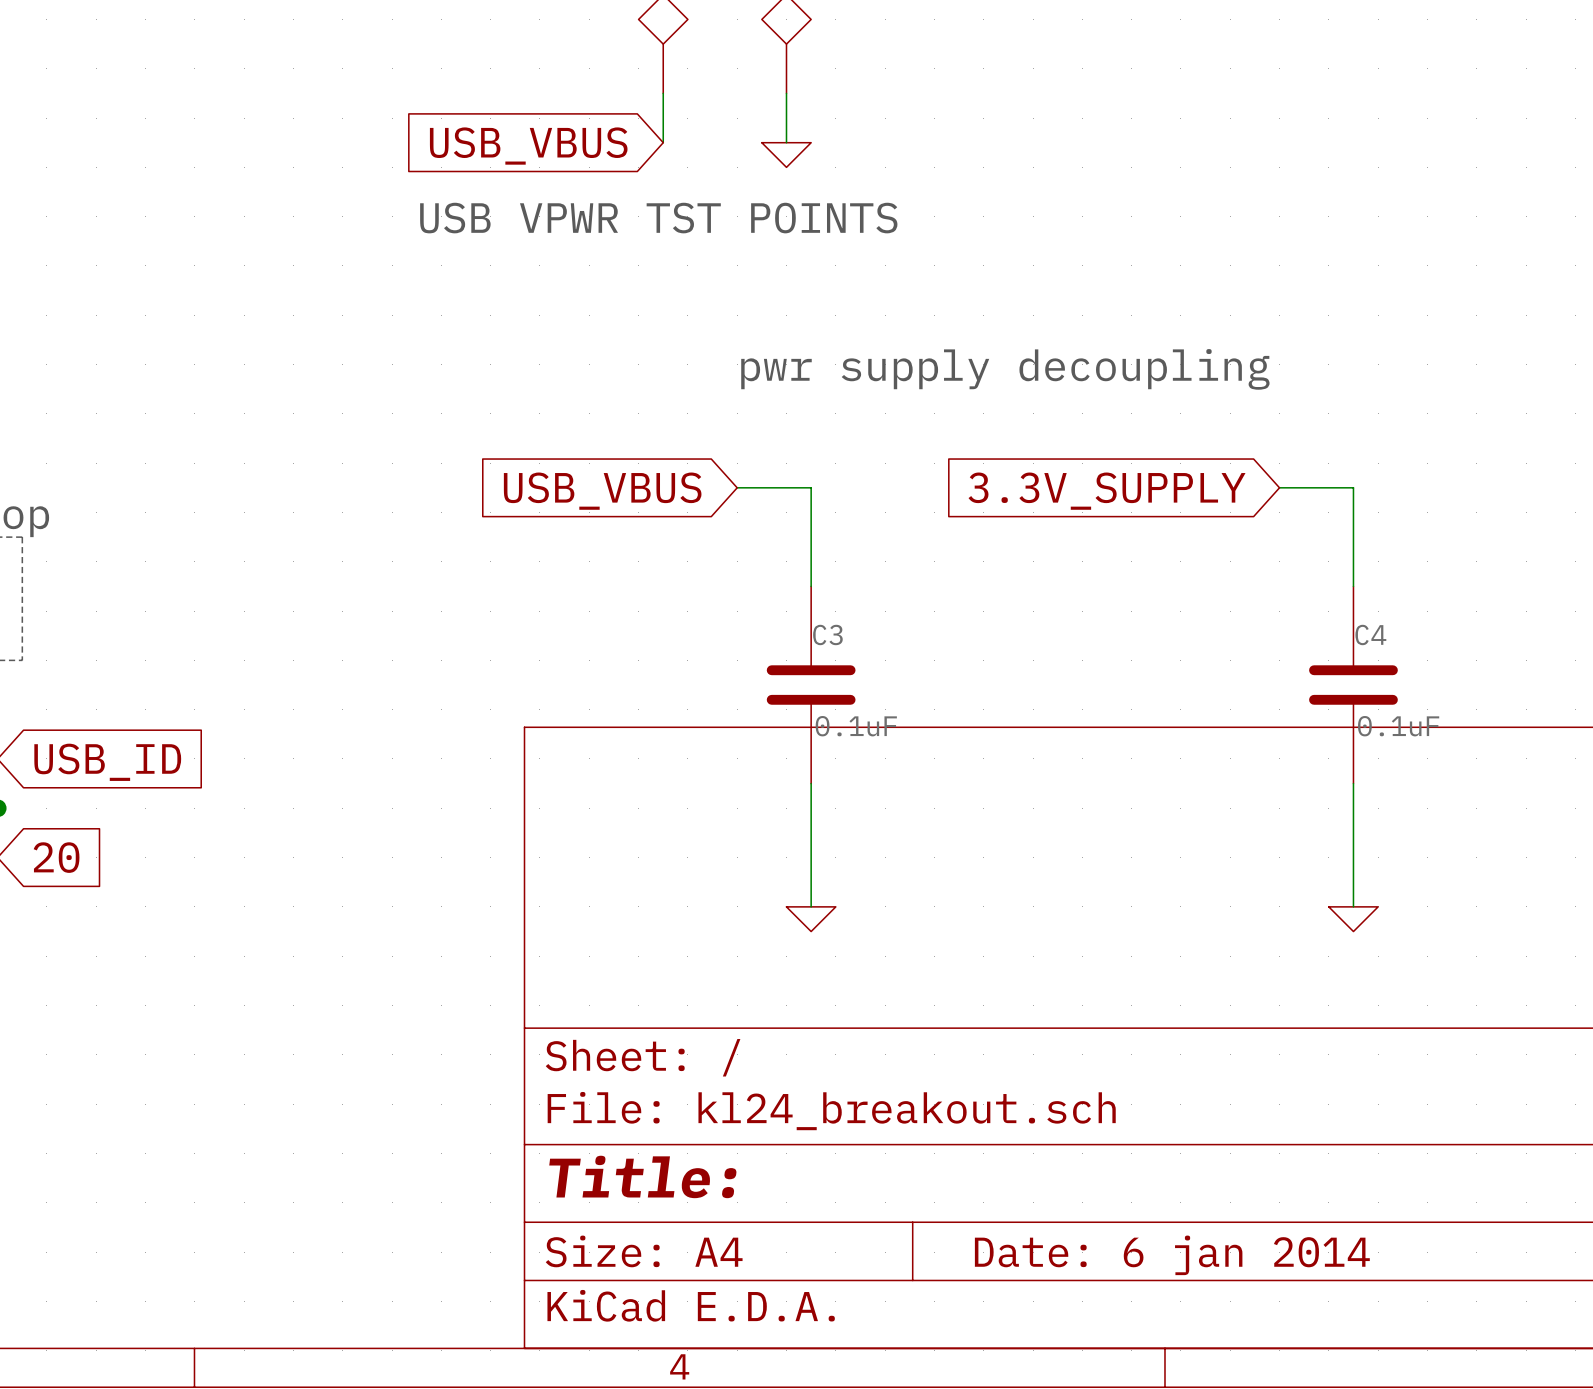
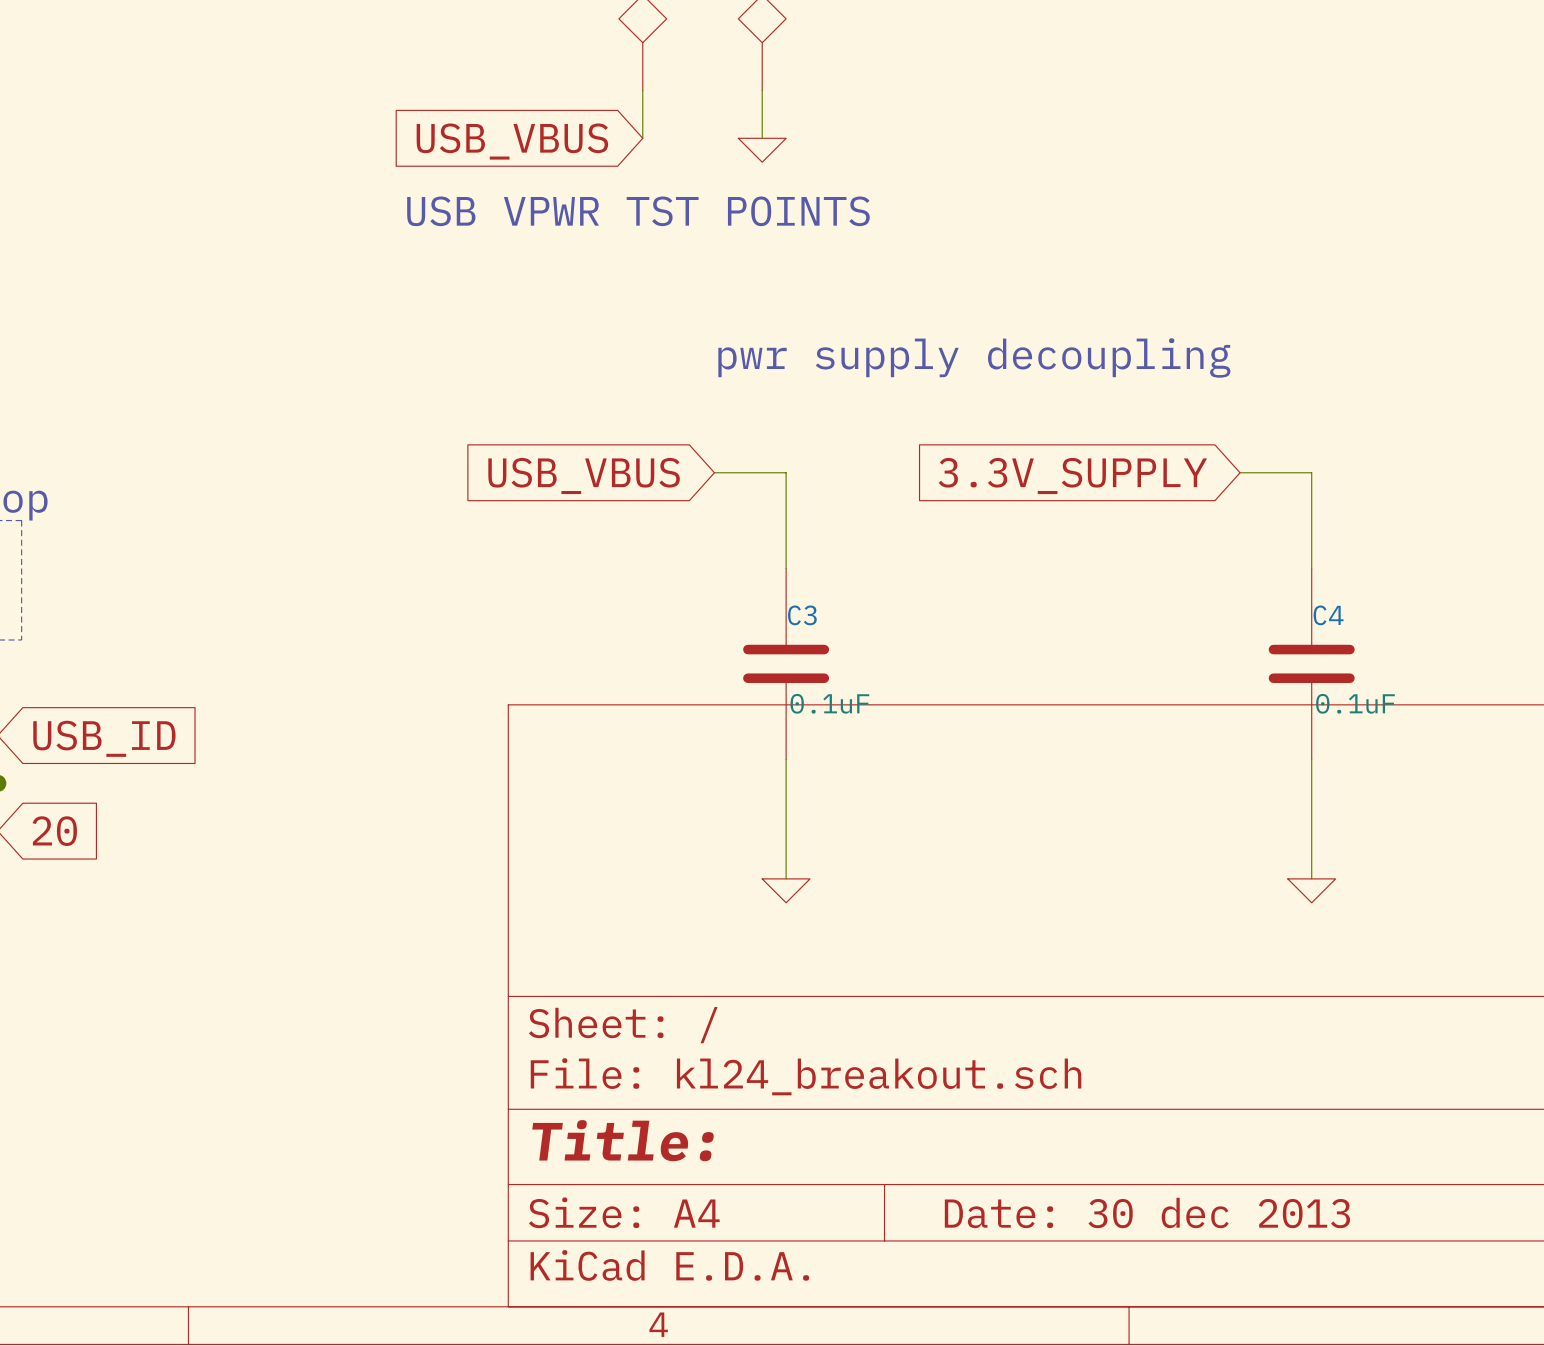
title block: Date: 6 jan 2014 (1172, 1255) -> Date: 30 dec 2013 (1147, 1212)

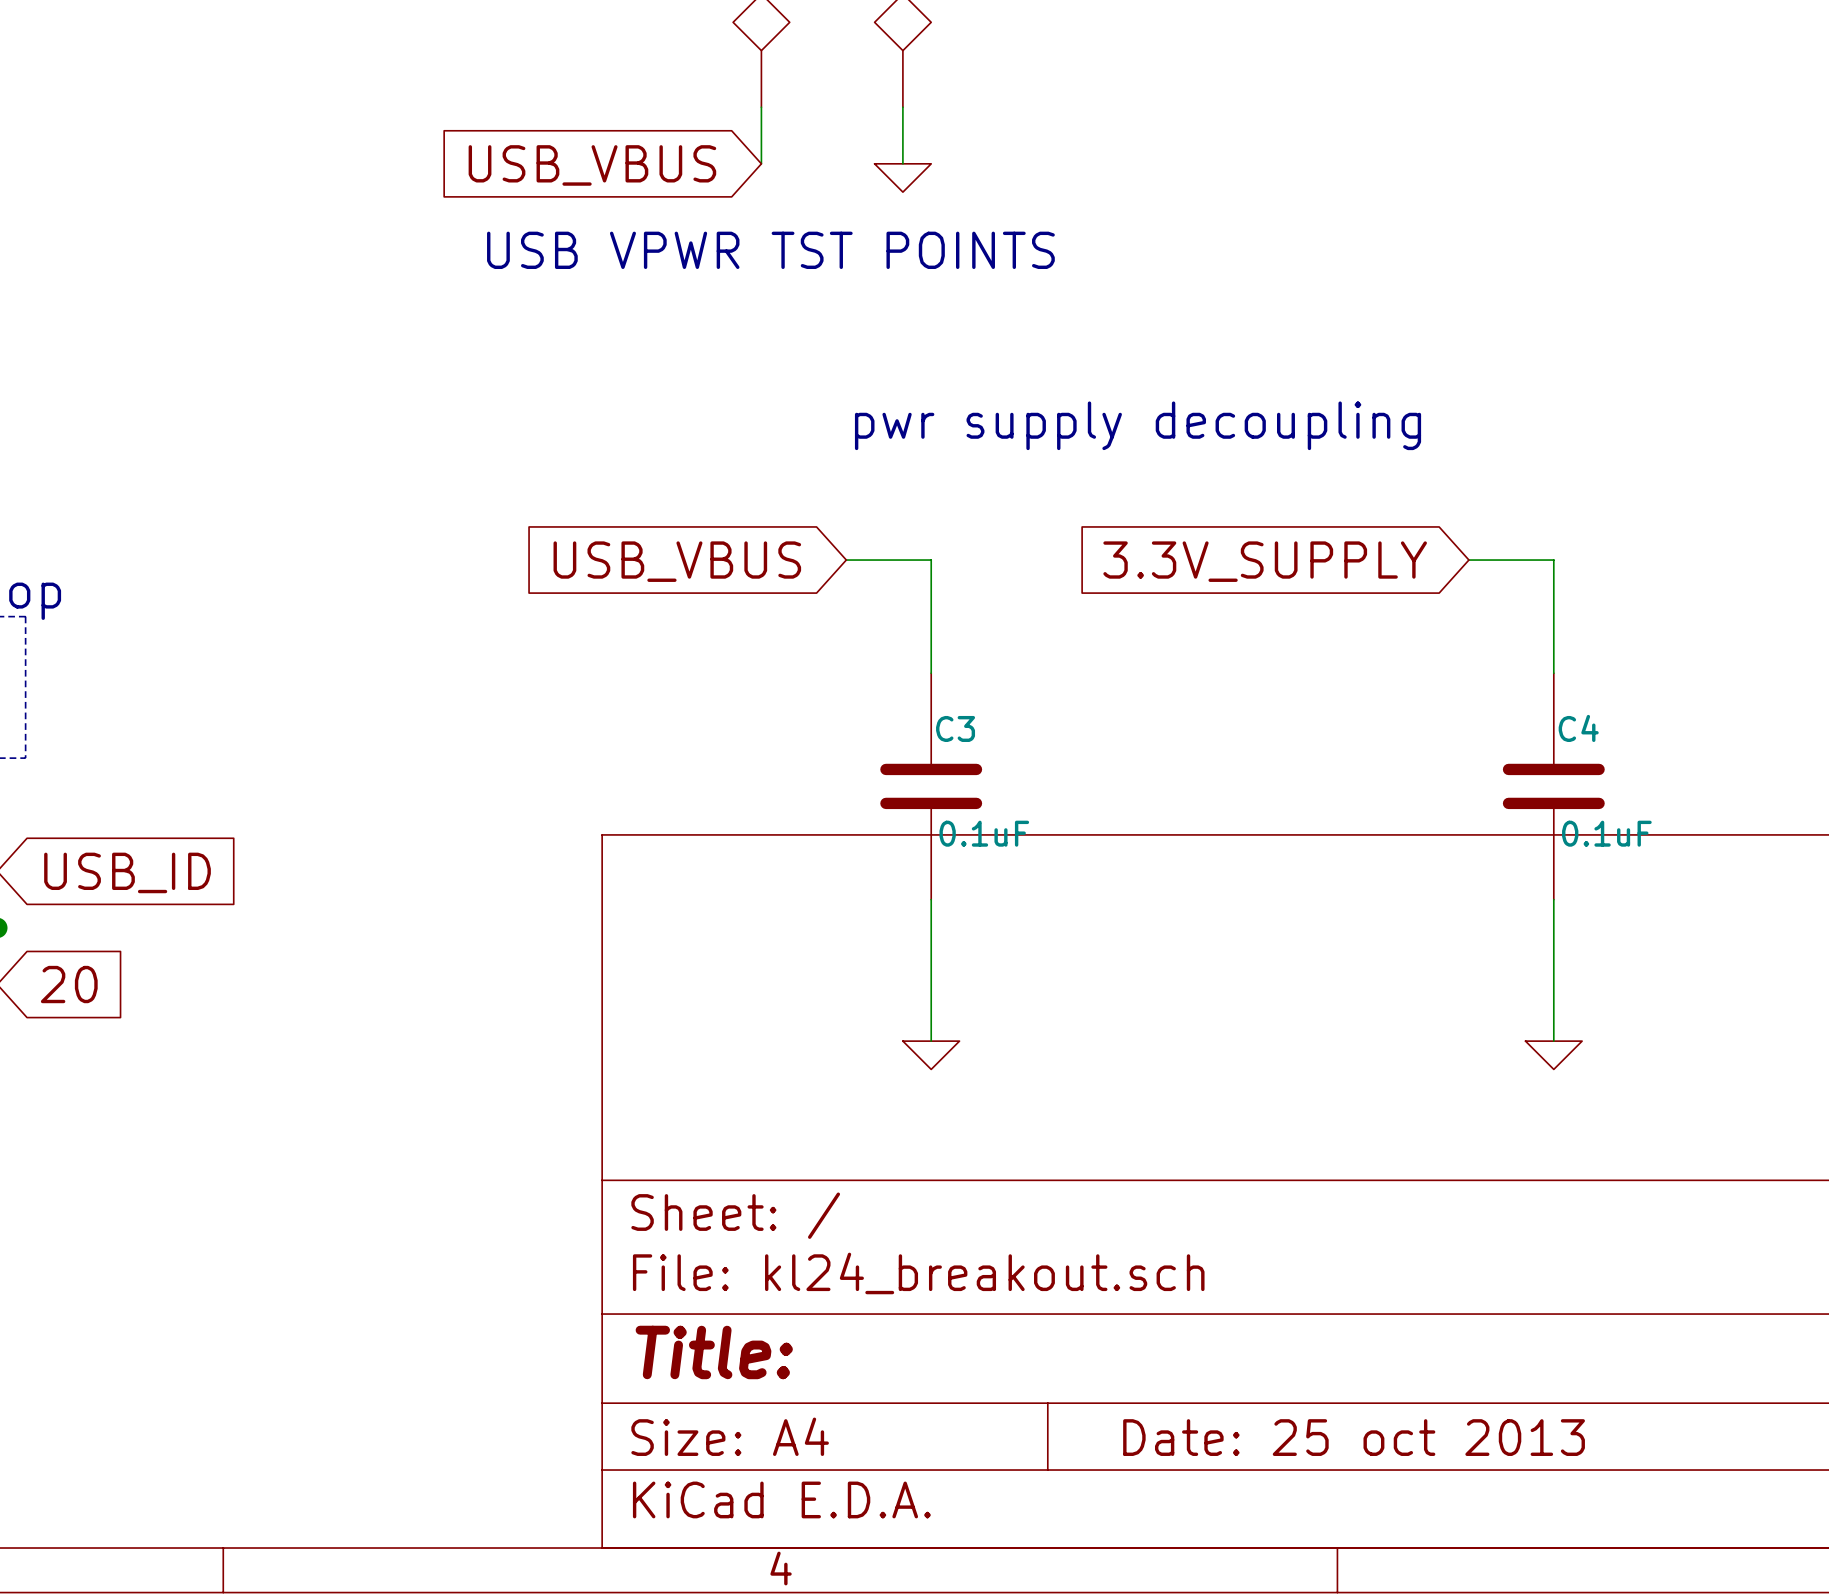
title block: Date: 30 dec 2013 (1147, 1212) -> Date: 25 oct 2013 (1354, 1437)

